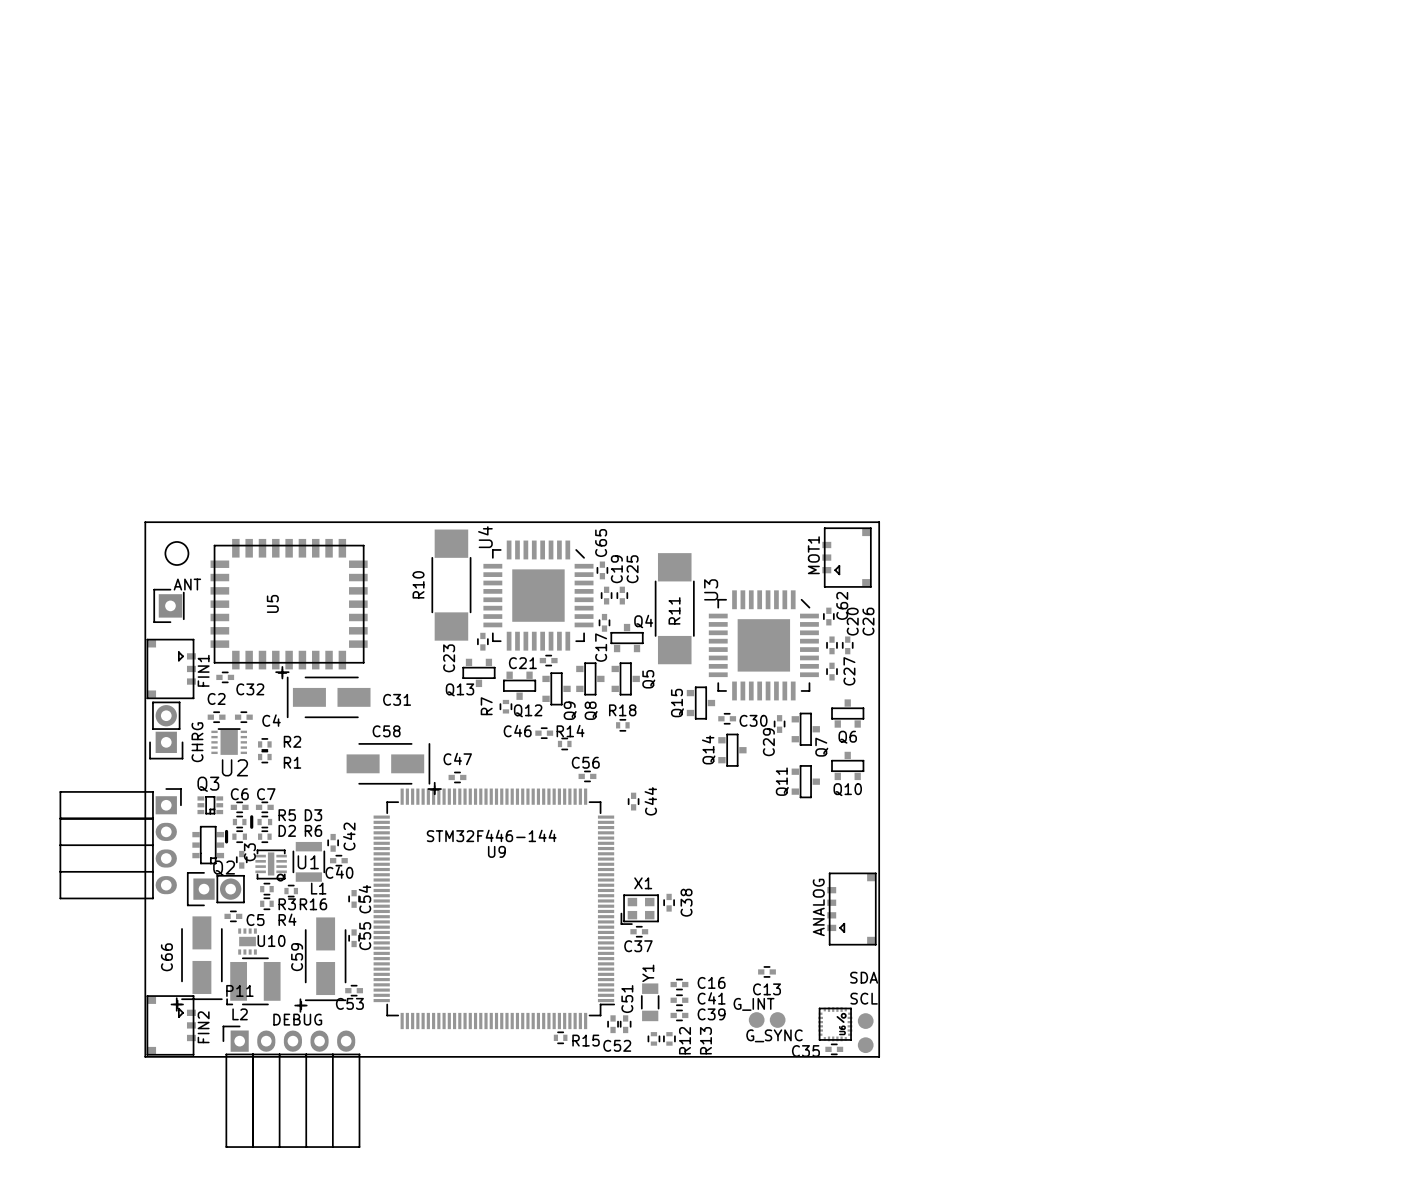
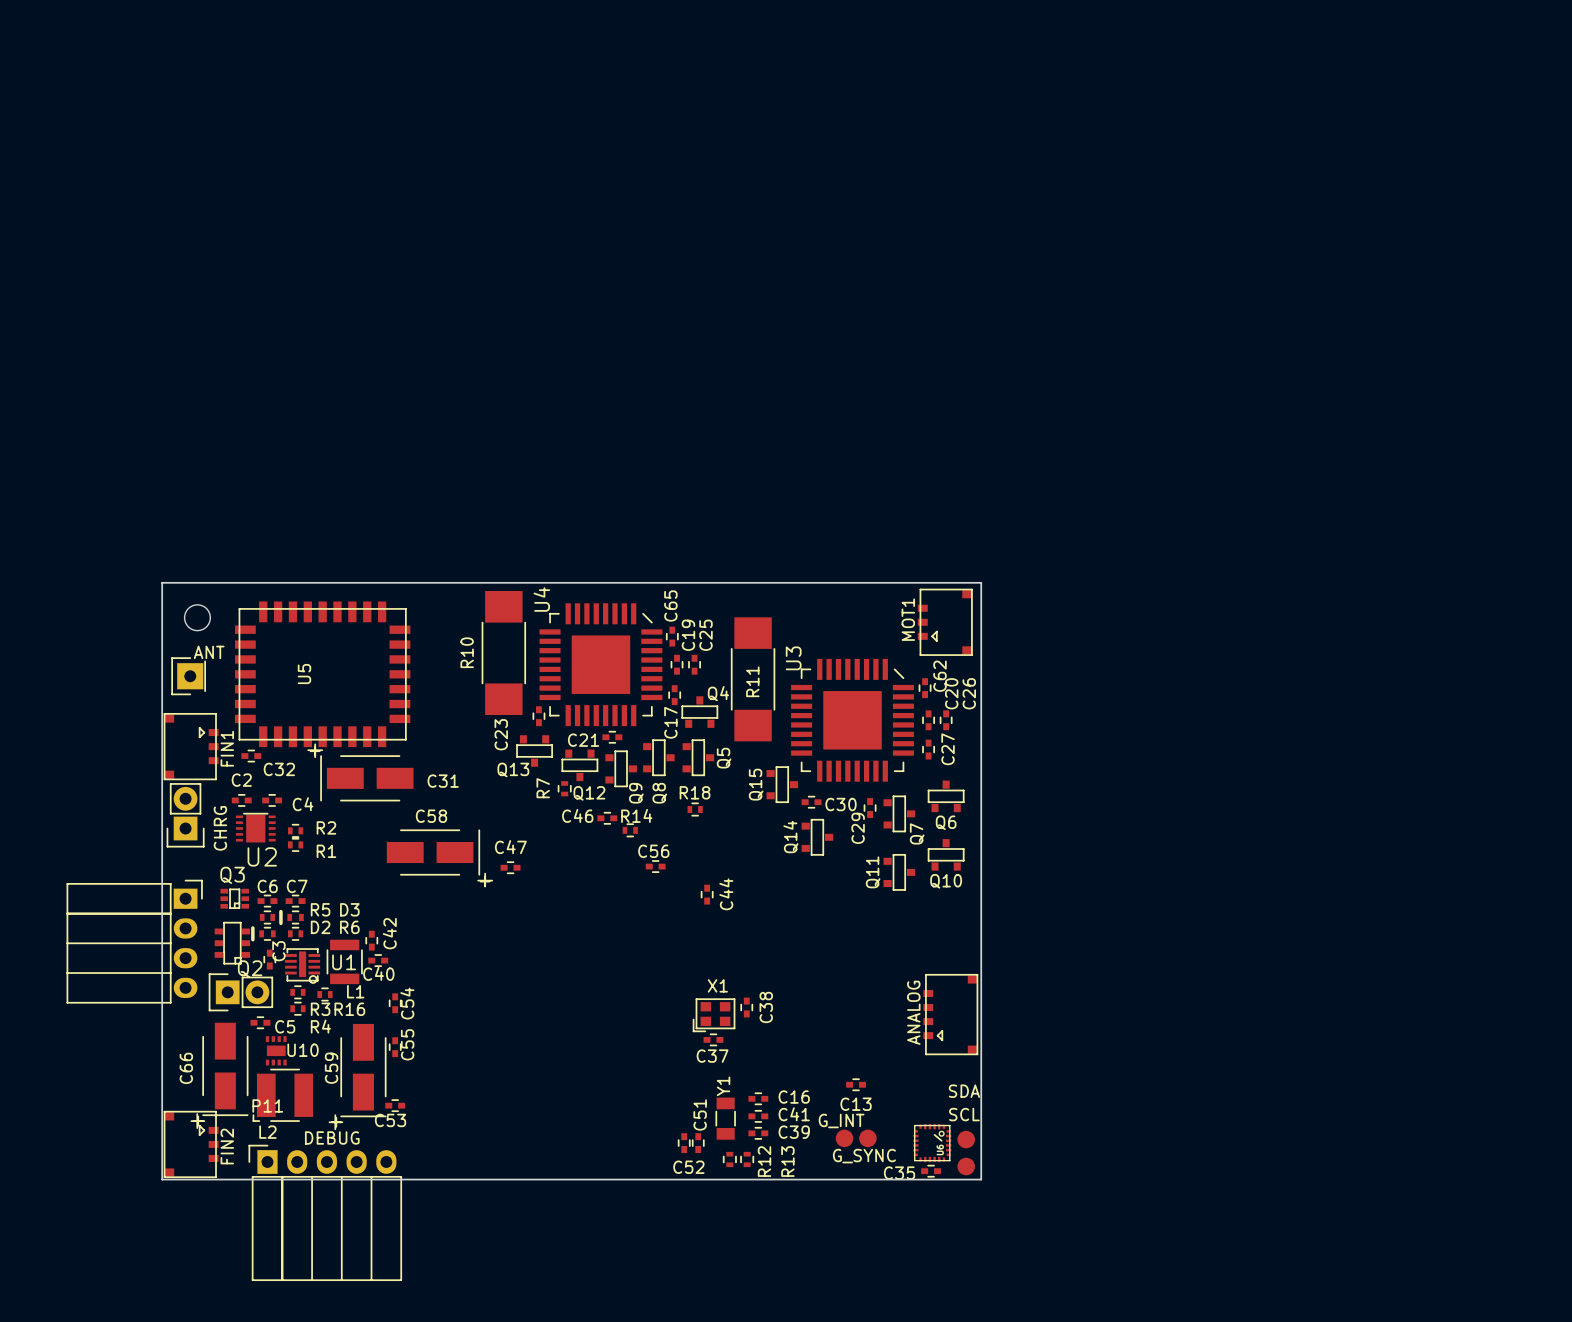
U9: STM32F446-144 (494, 908) -> none
R15: (560, 1037) -> none

